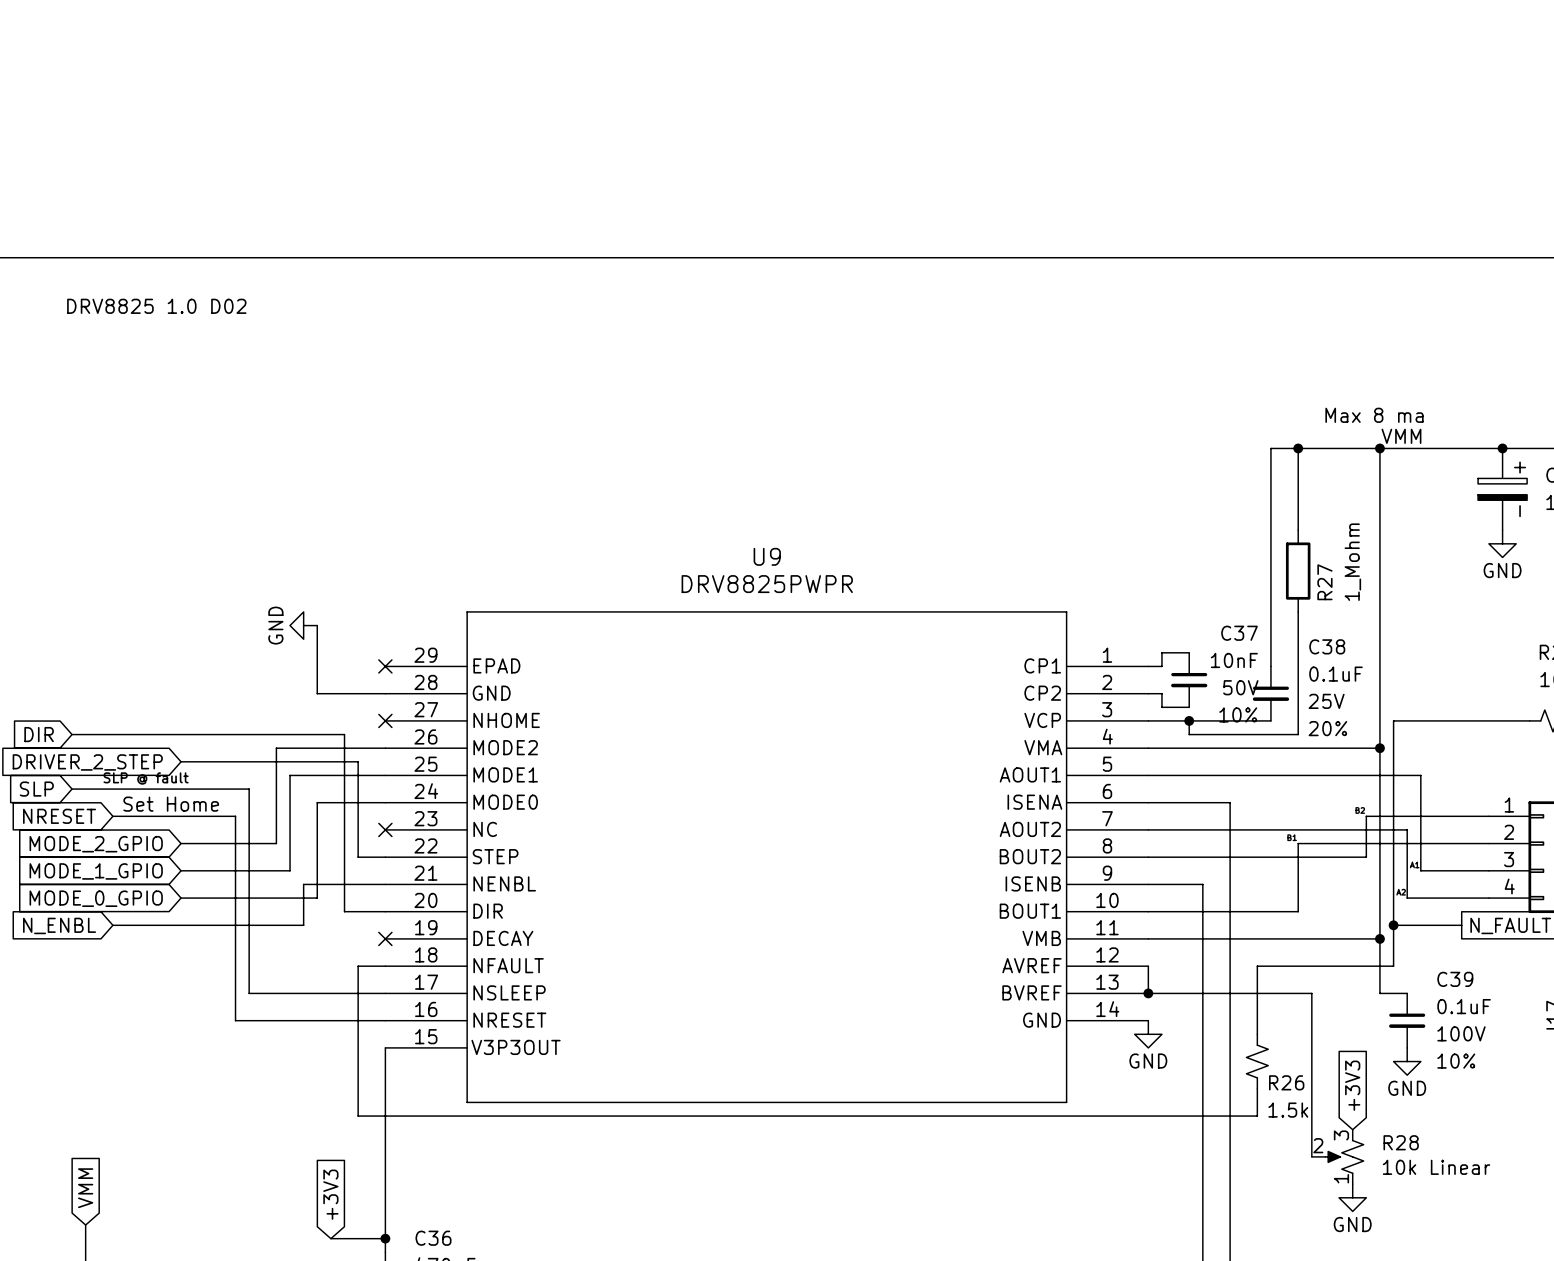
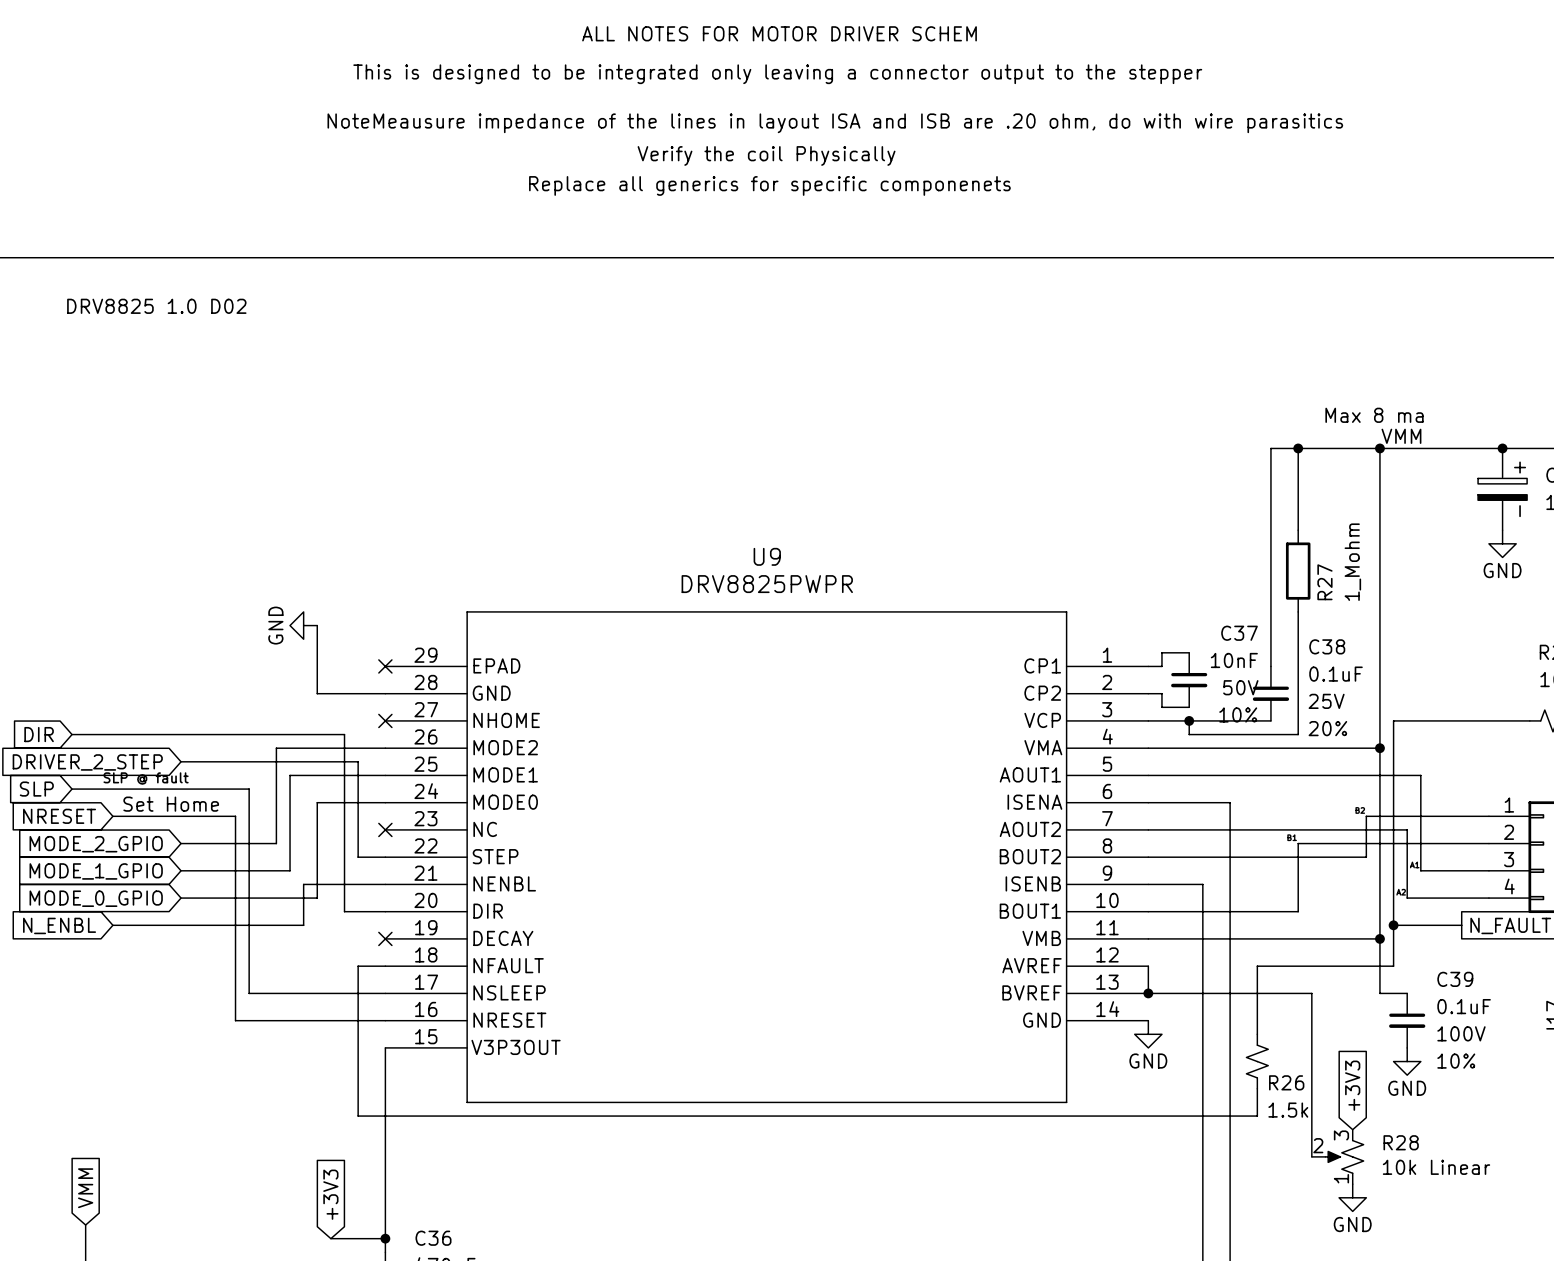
text: none -> ALL NOTES FOR MOTOR DRIVER SCHEM (779, 33)
text: none -> This is designed to be integrated only leaving a connector output to the stepper (777, 74)
text: none -> NoteMeausure impedance of the lines in layout ISA and ISB are .20 ohm, do with wire parasitics (835, 123)
text: none -> Verify the coil Physically (766, 155)
text: none -> Replace all generics for specific componenets (769, 185)

